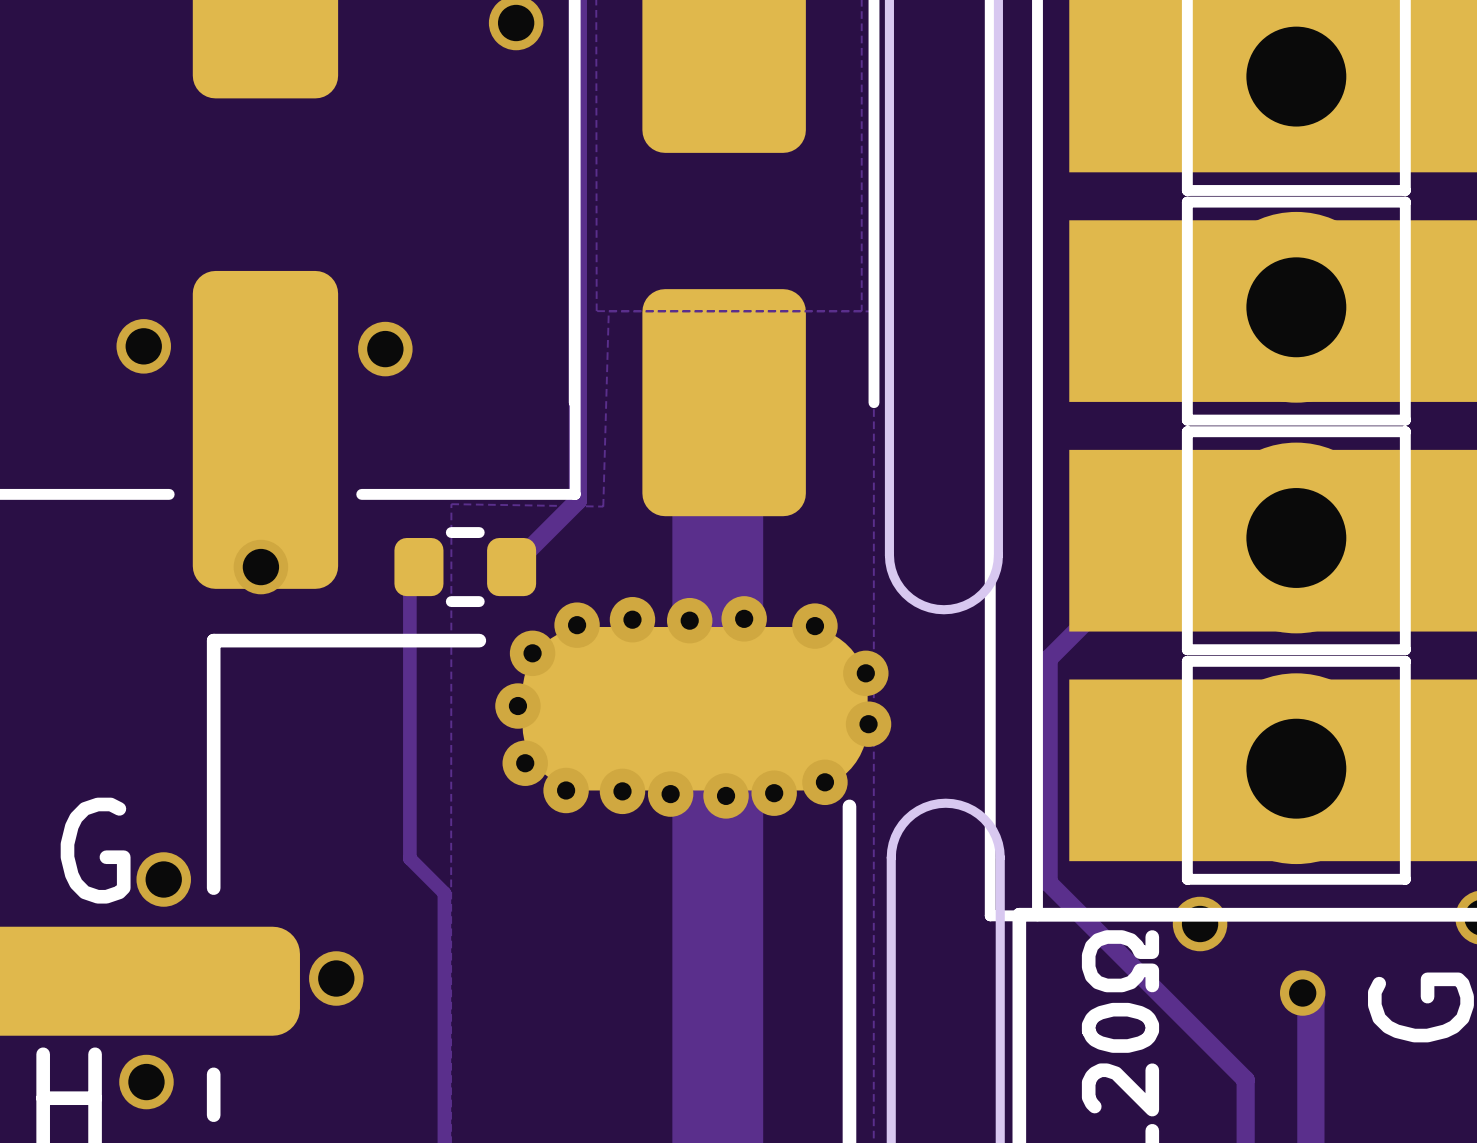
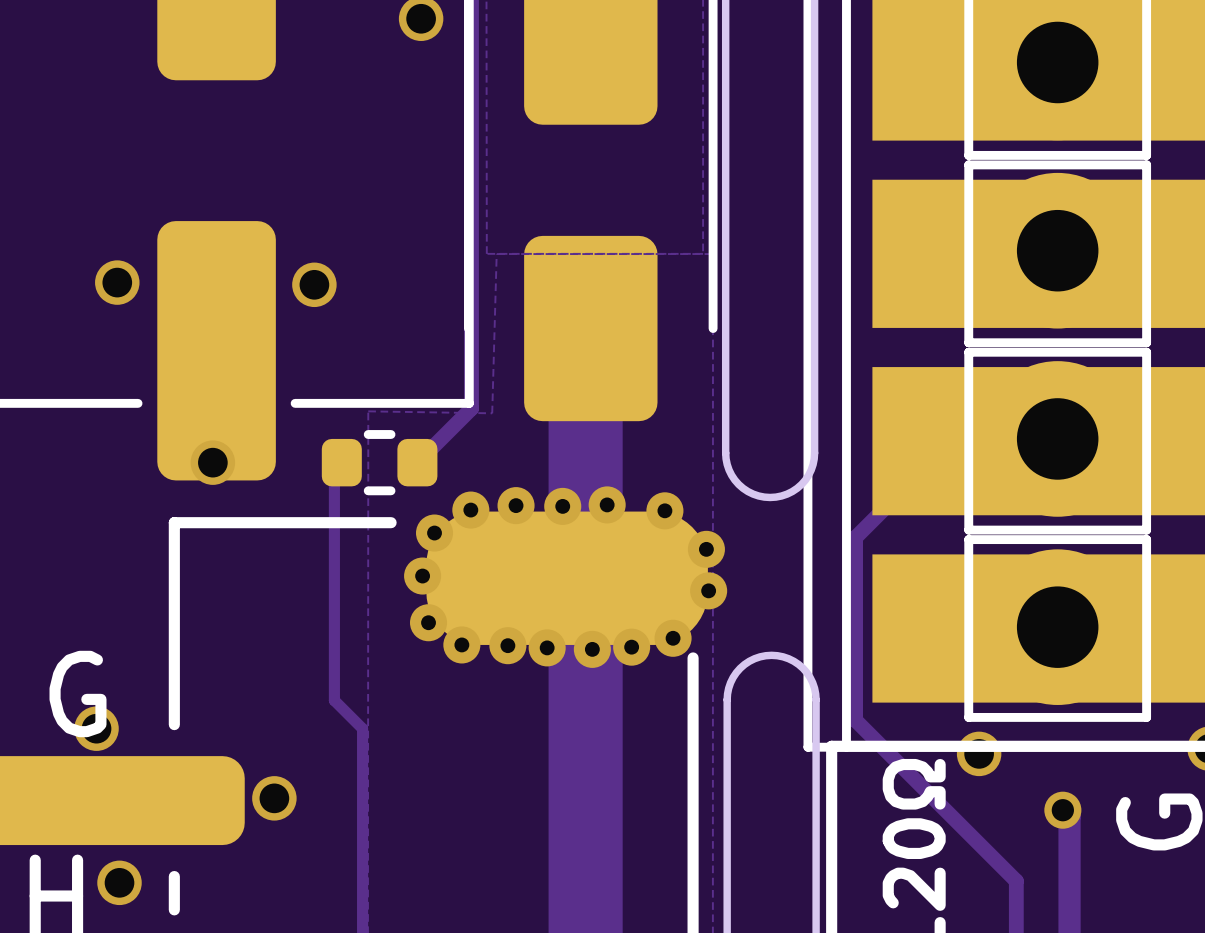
via position: (163, 879) -> (96, 728)

